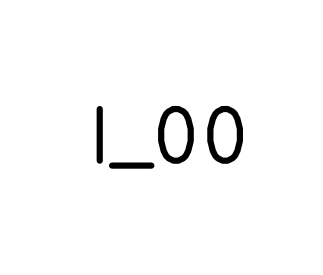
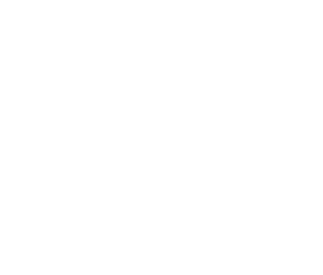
label: I_00 (169, 137) -> none

